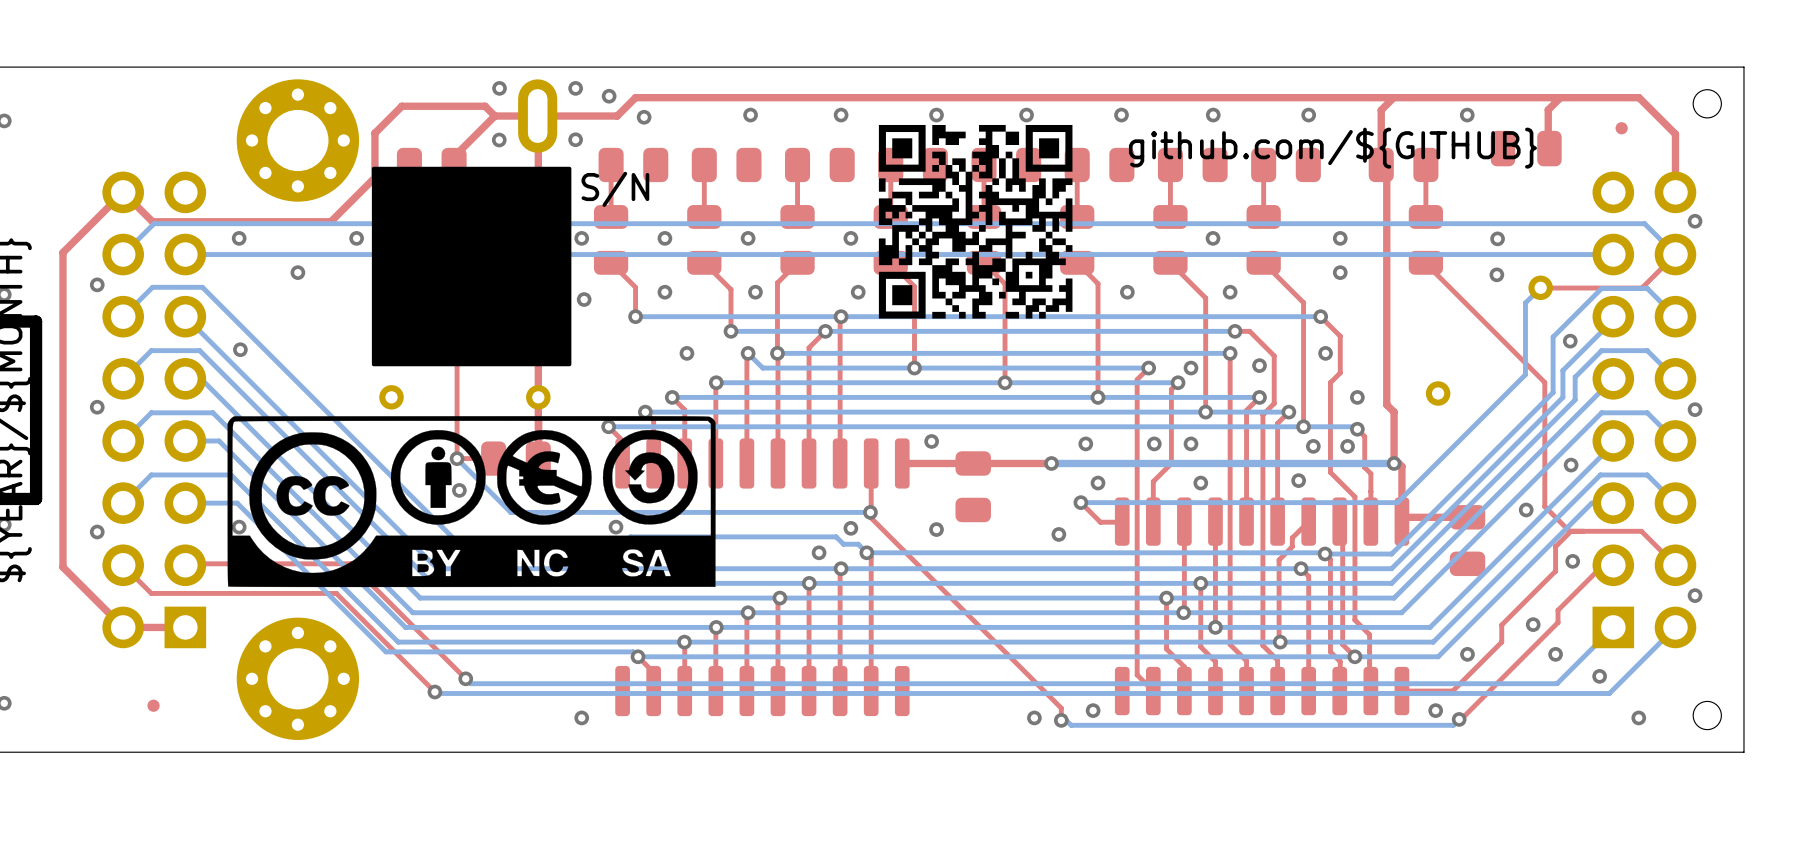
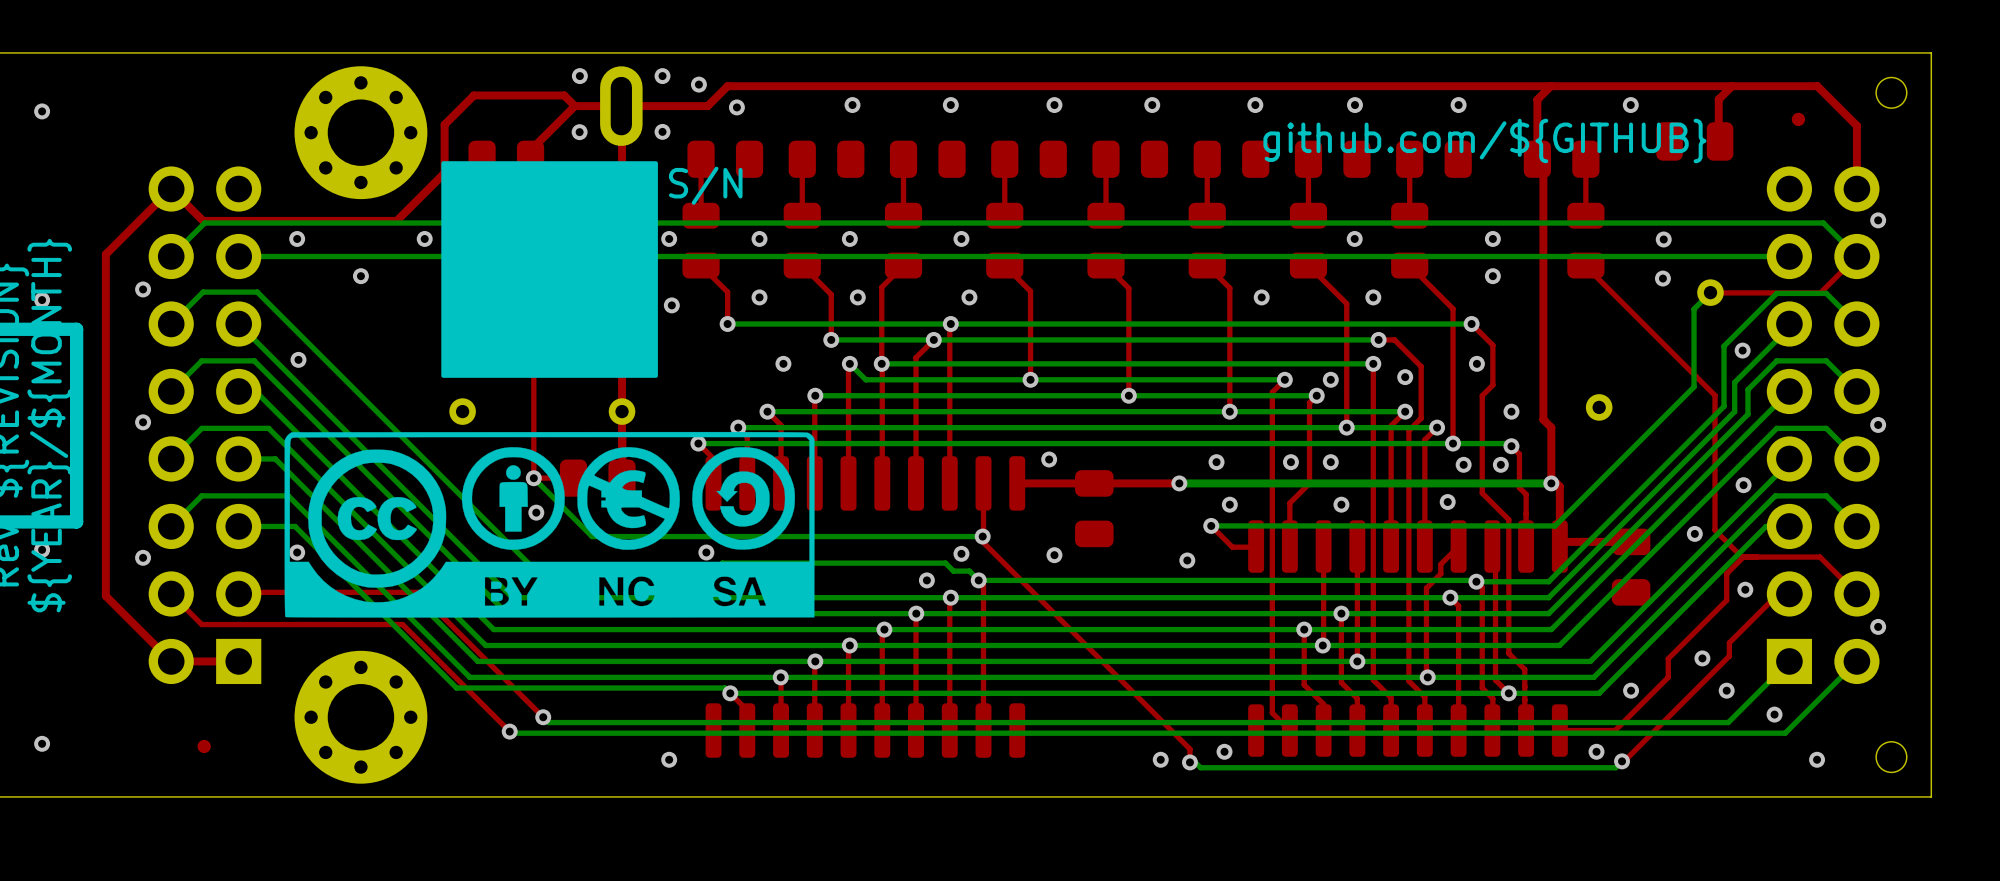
drawing: [878, 124, 1073, 319] -> none

